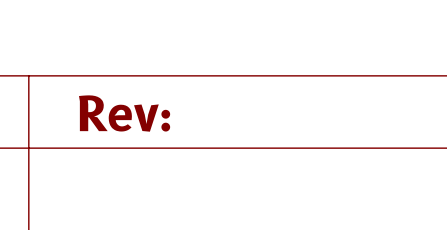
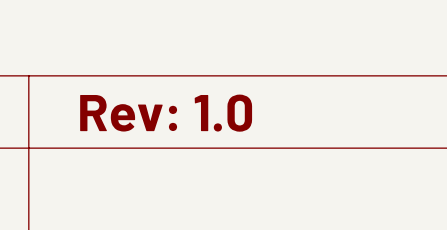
title block: Rev: (124, 113) -> Rev: 1.0 (166, 113)

